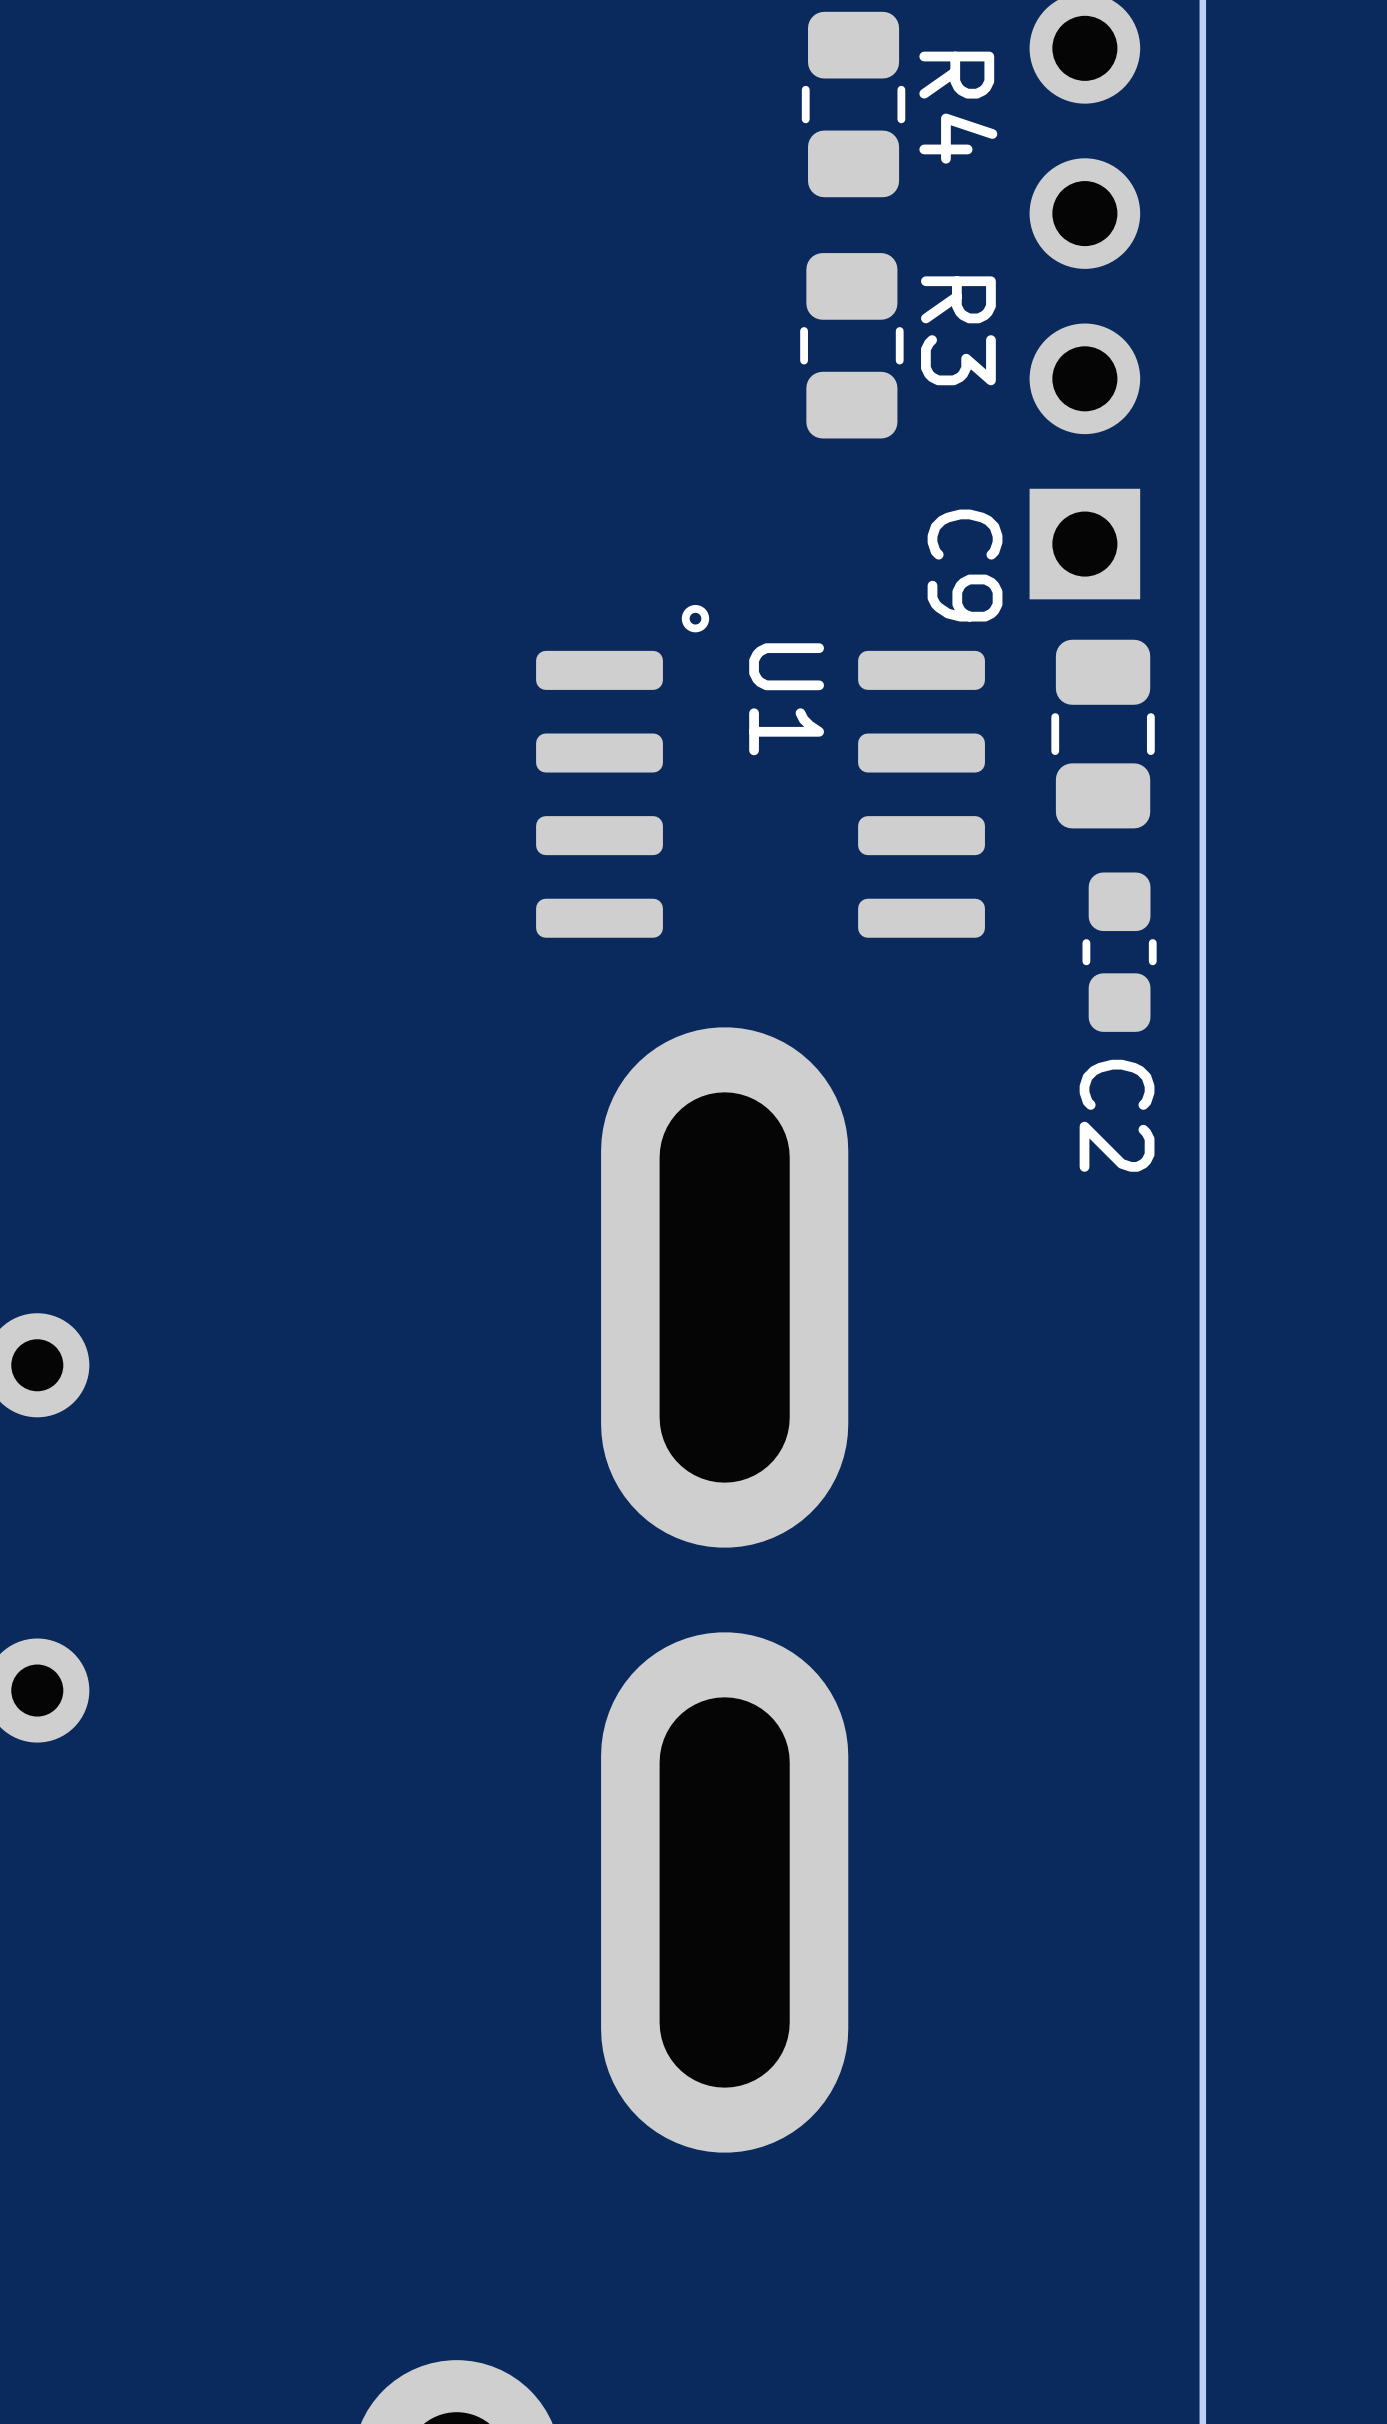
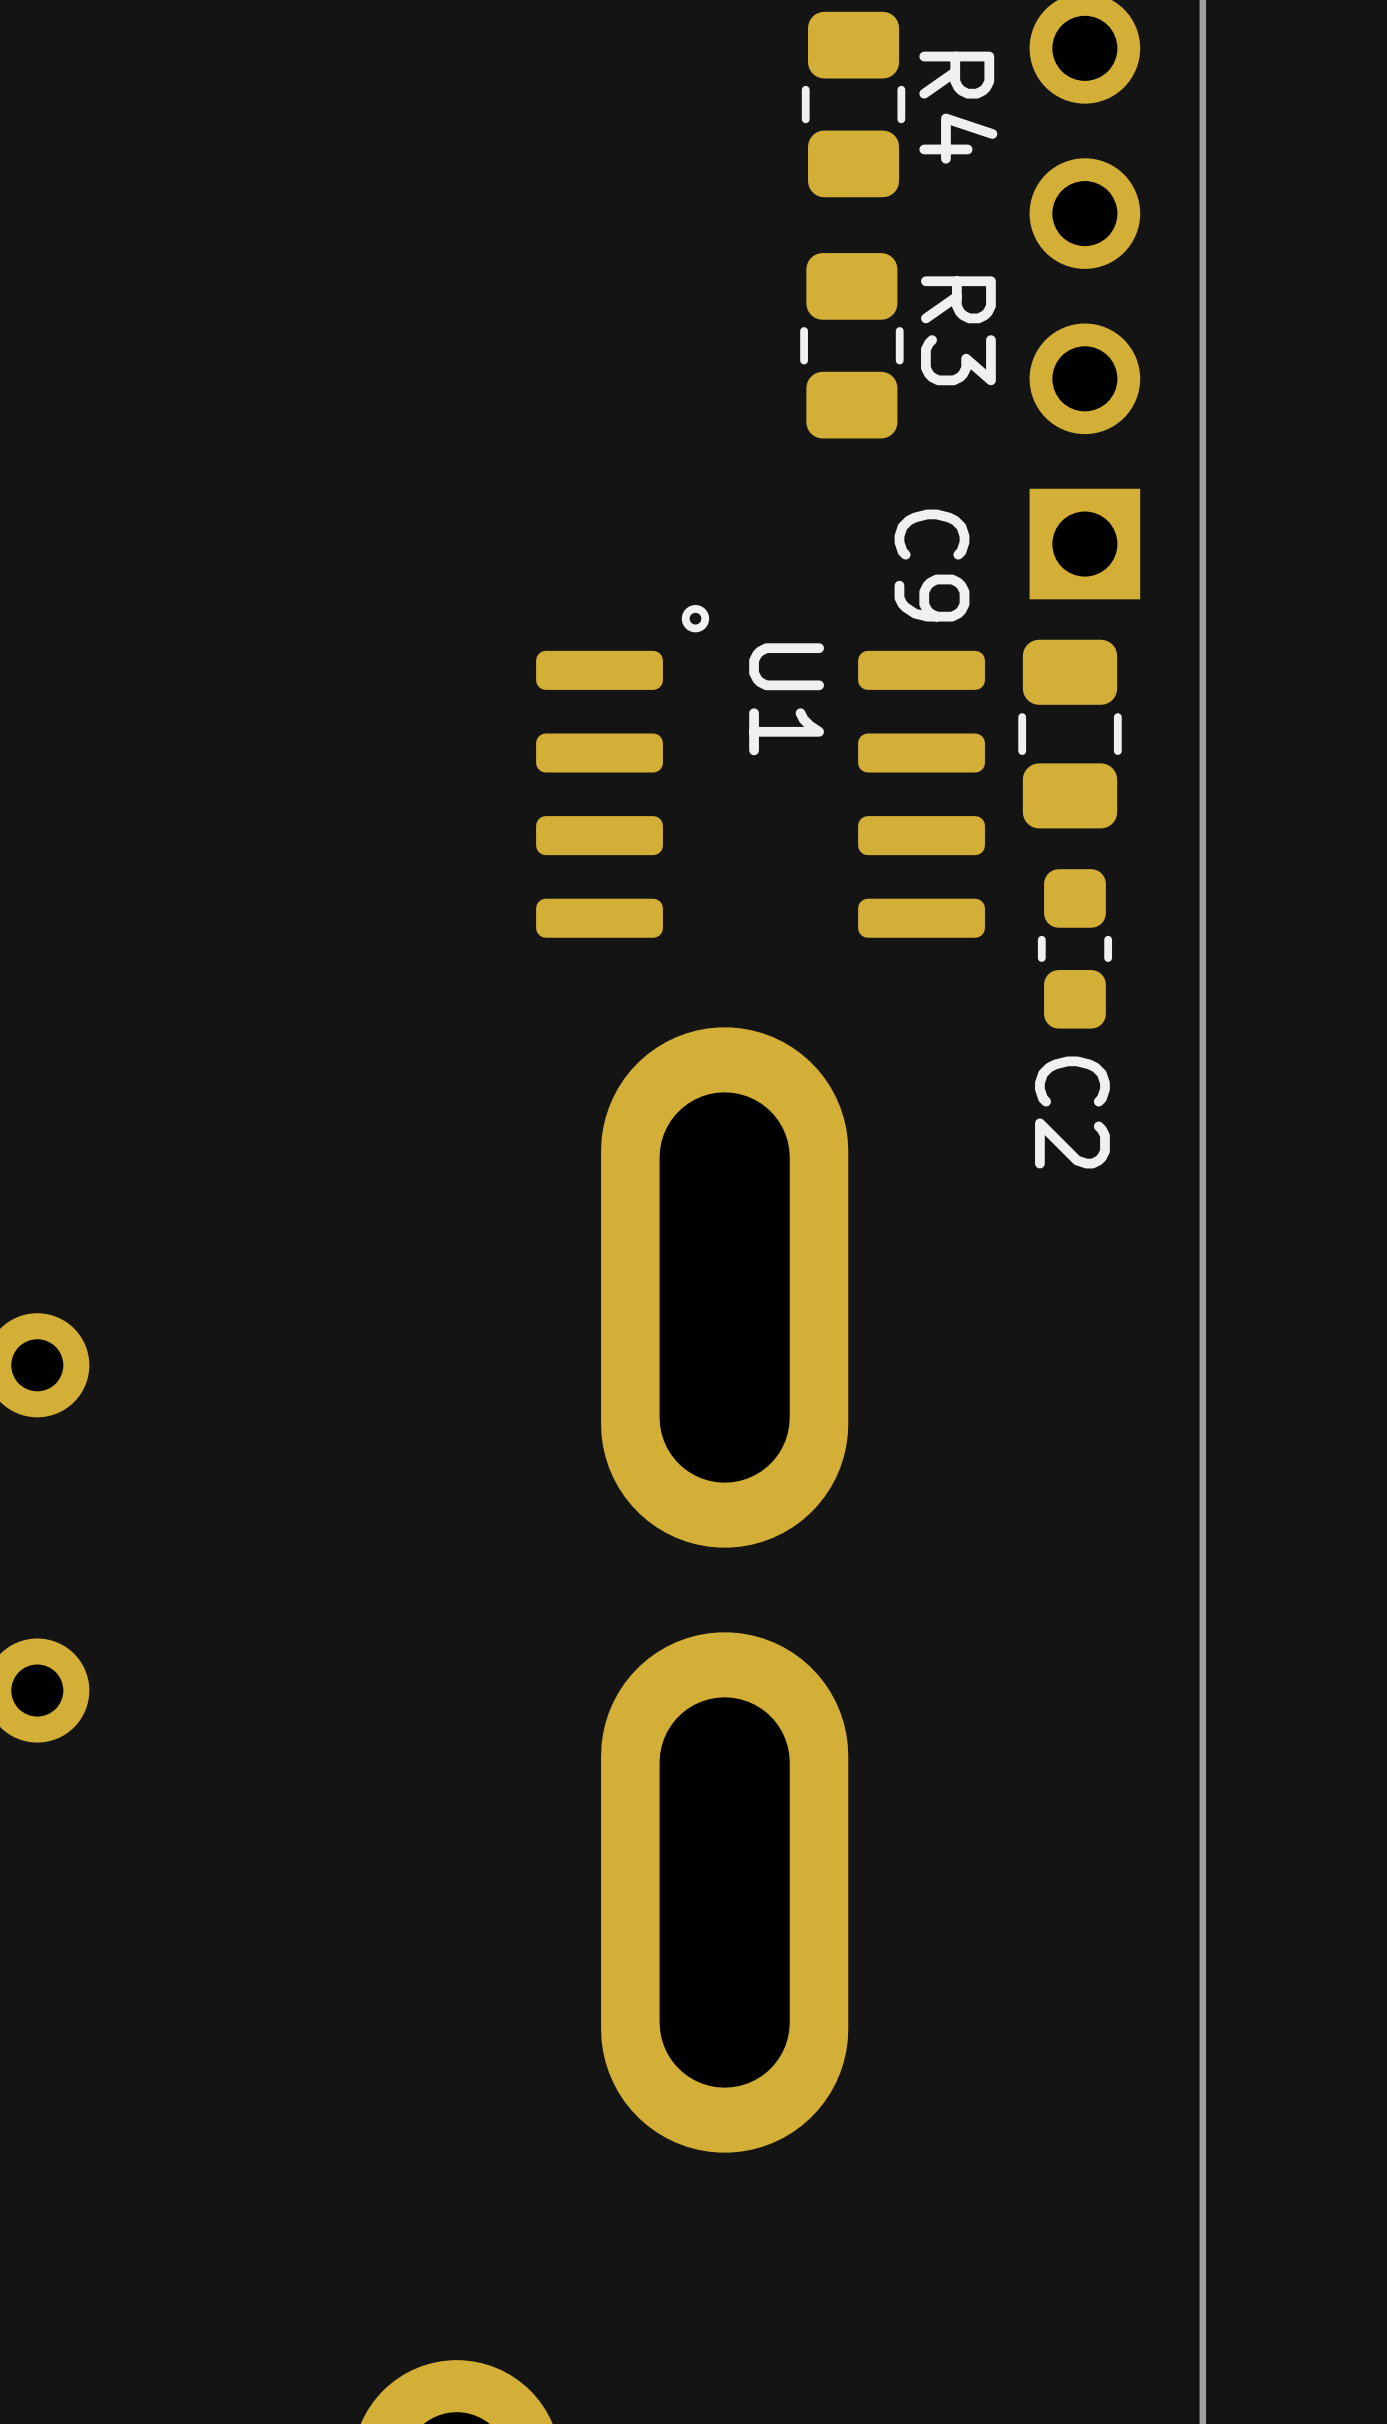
C9 position: (1103, 734) -> (1070, 734)
C2 position: (1119, 952) -> (1074, 948)

